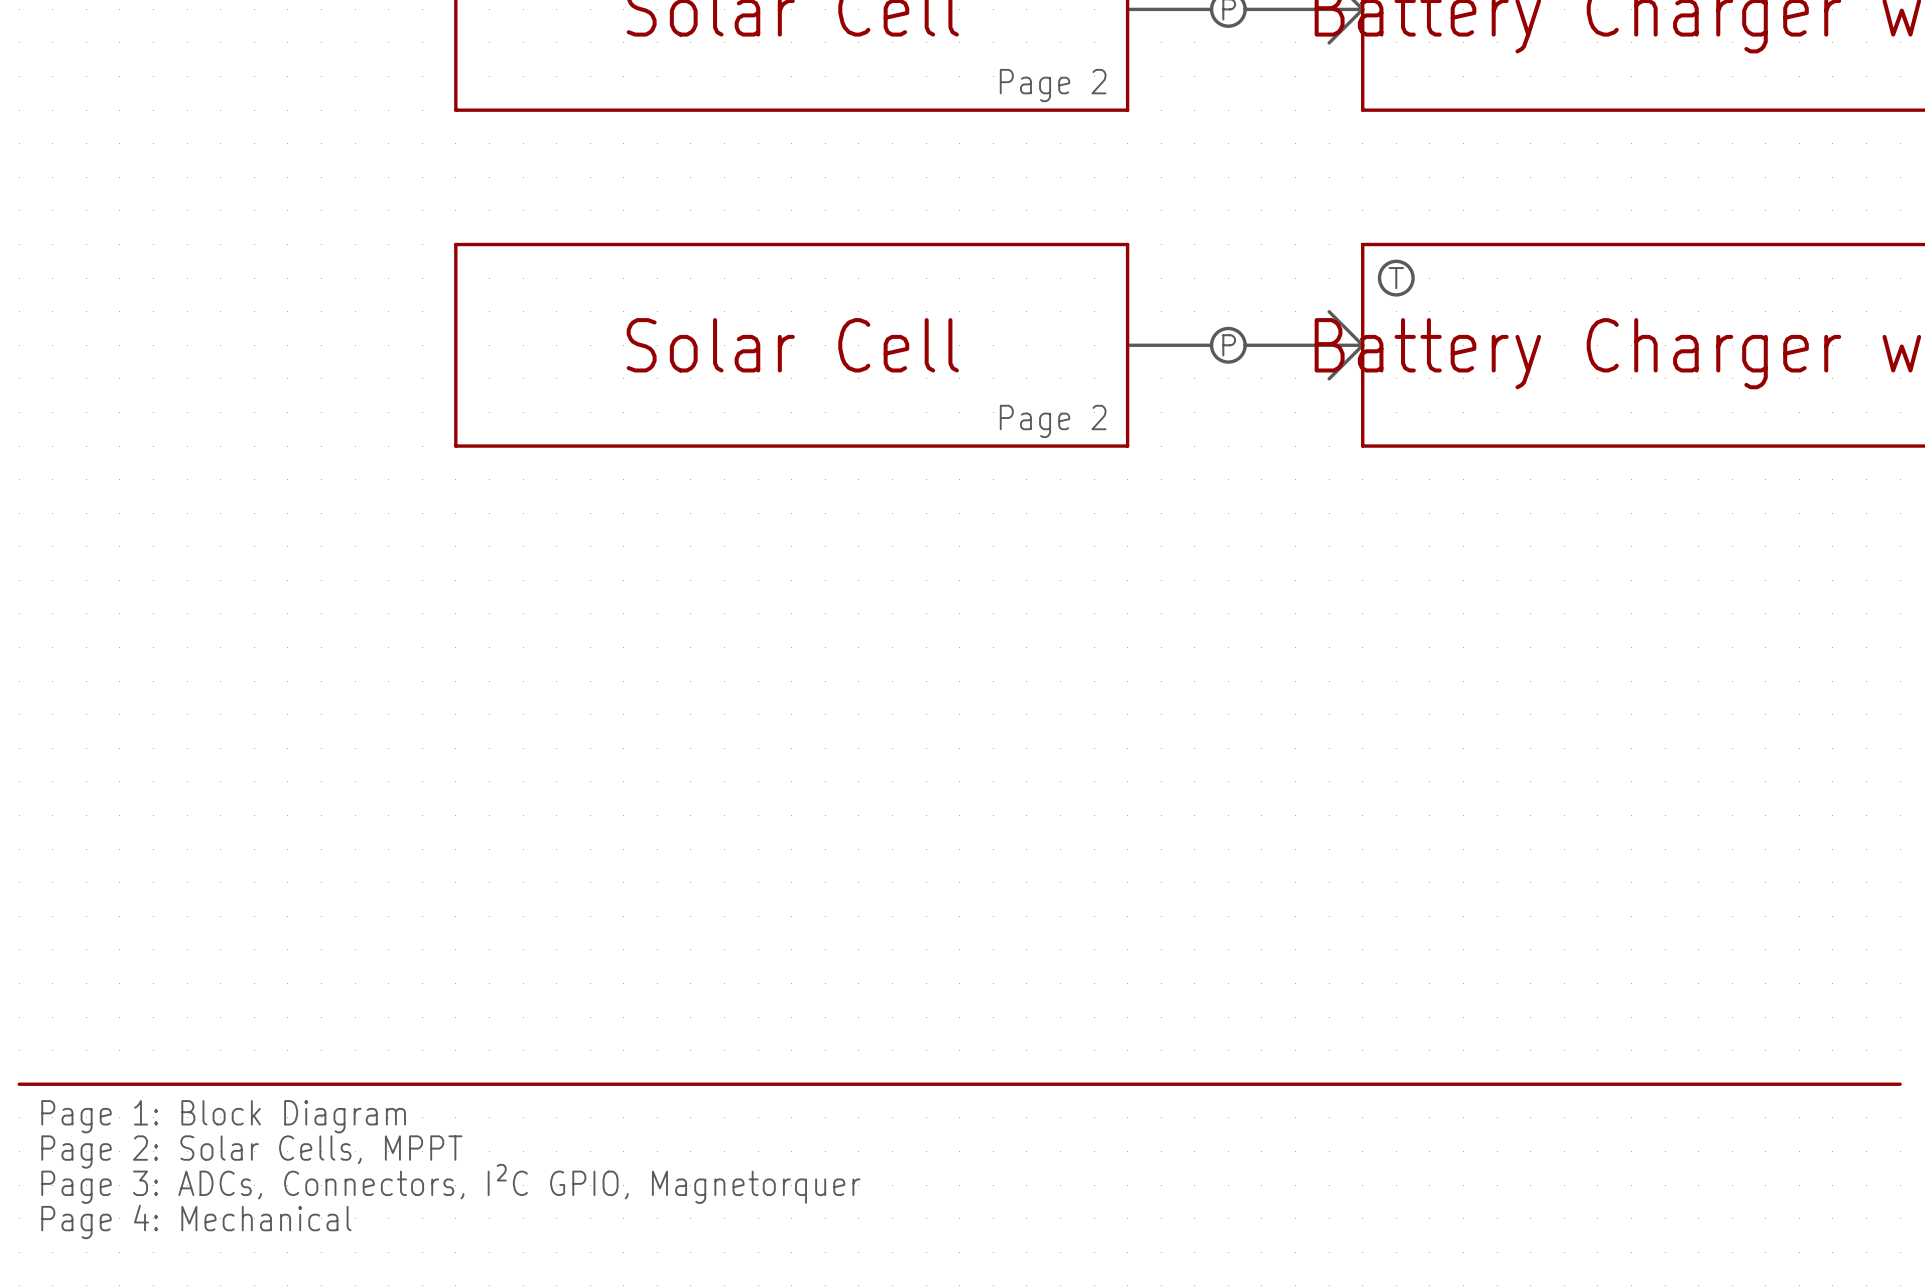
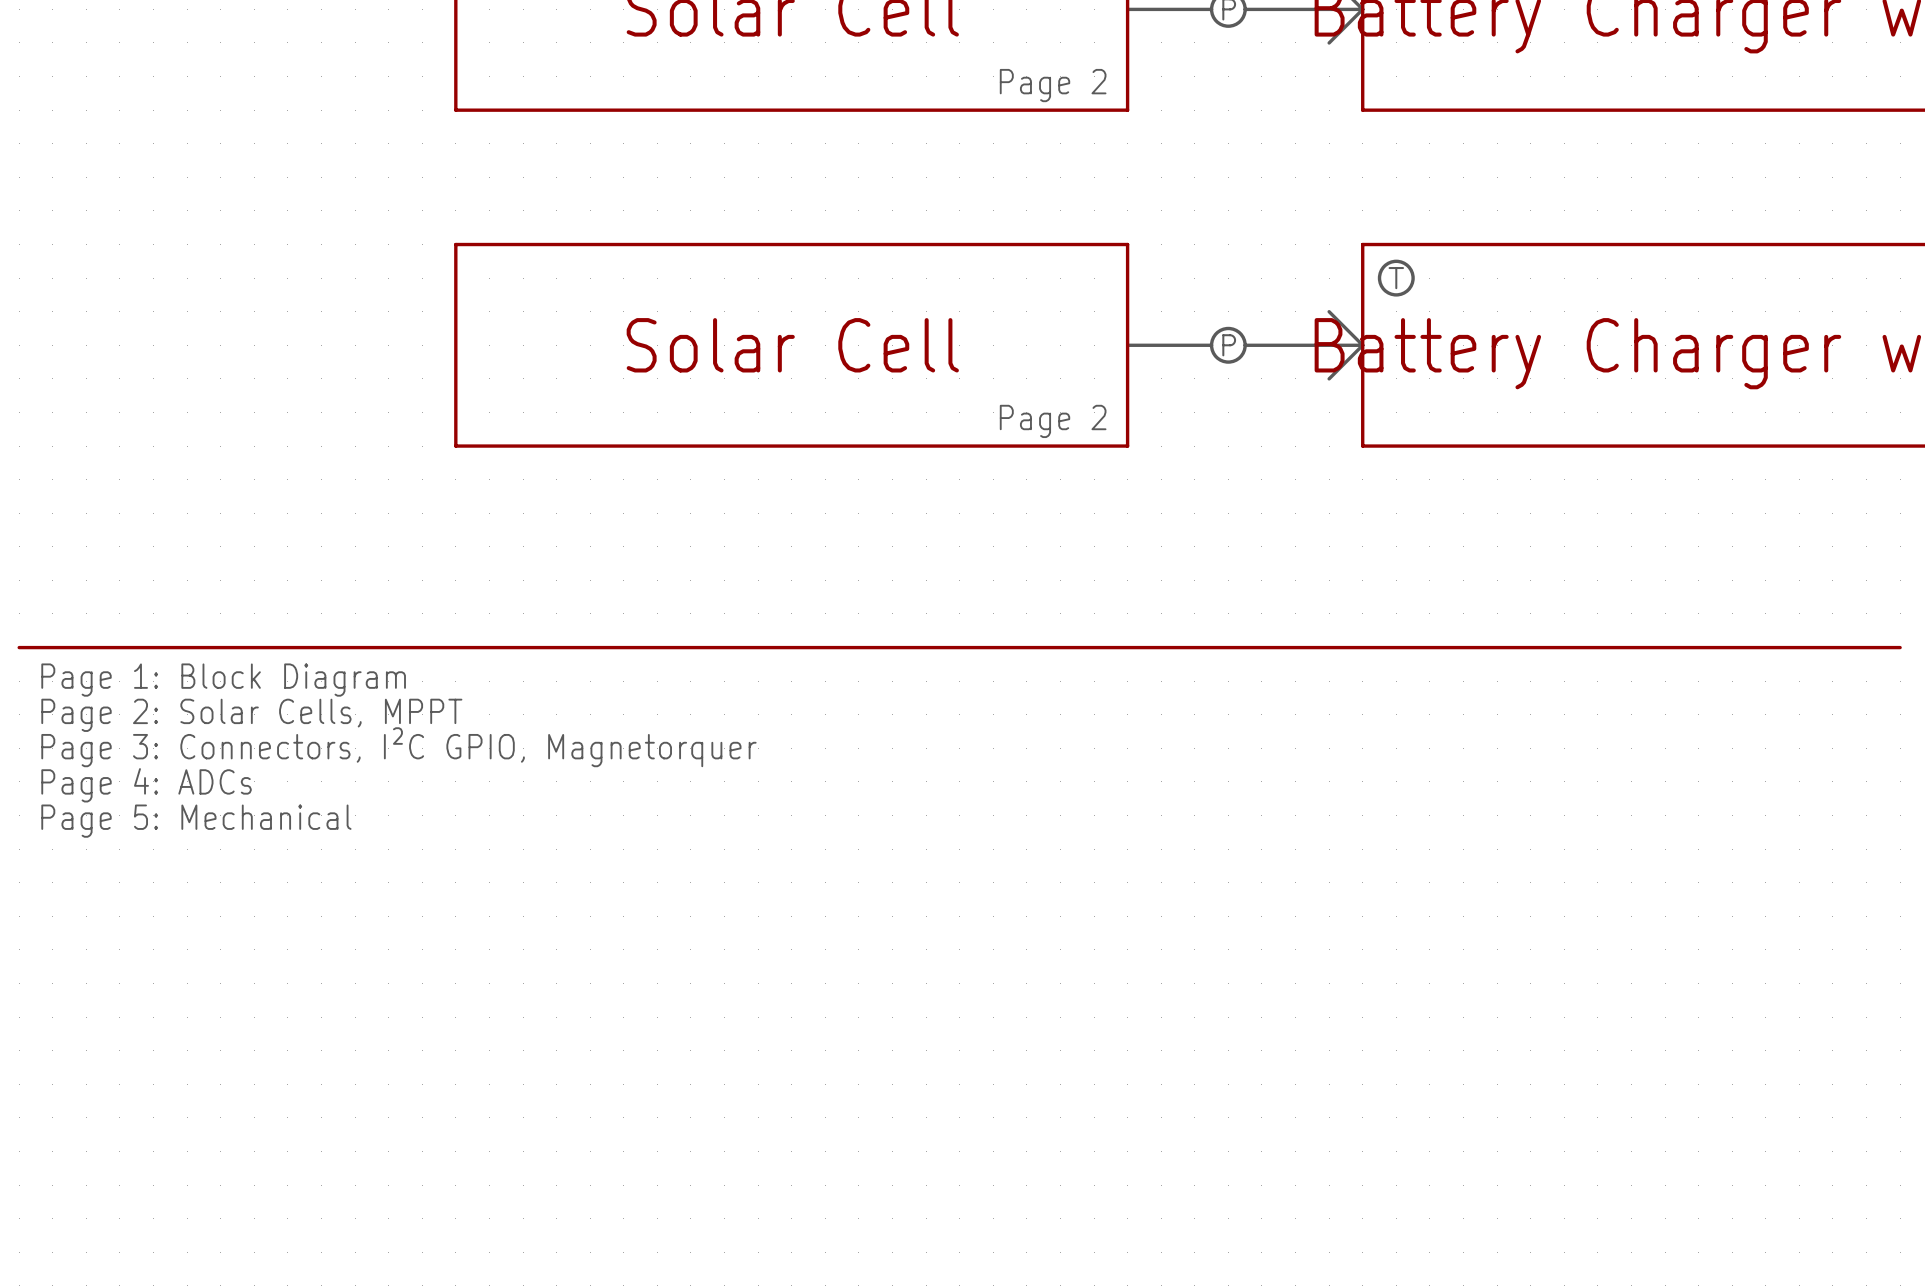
line: none -> (19, 647) (1900, 647)
text: none -> Page 1: Block Diagram (223, 680)
text: none -> Page 2: Solar Cells, MPPT (251, 715)
text: none -> Page 3: Connectors, I²C GPIO, Magnetorquer (398, 747)
text: none -> Page 4: ADCs (146, 785)
text: none -> Page 5: Mechanical (196, 821)
line: (19, 1084) (1900, 1084) -> none
text: Page 1: Block Diagram (223, 1116) -> none
text: Page 2: Solar Cells, MPPT (251, 1151) -> none
text: Page 3: ADCs, Connectors, I²C GPIO, Magnetorquer (450, 1183) -> none
text: Page 4: Mechanical (196, 1221) -> none

